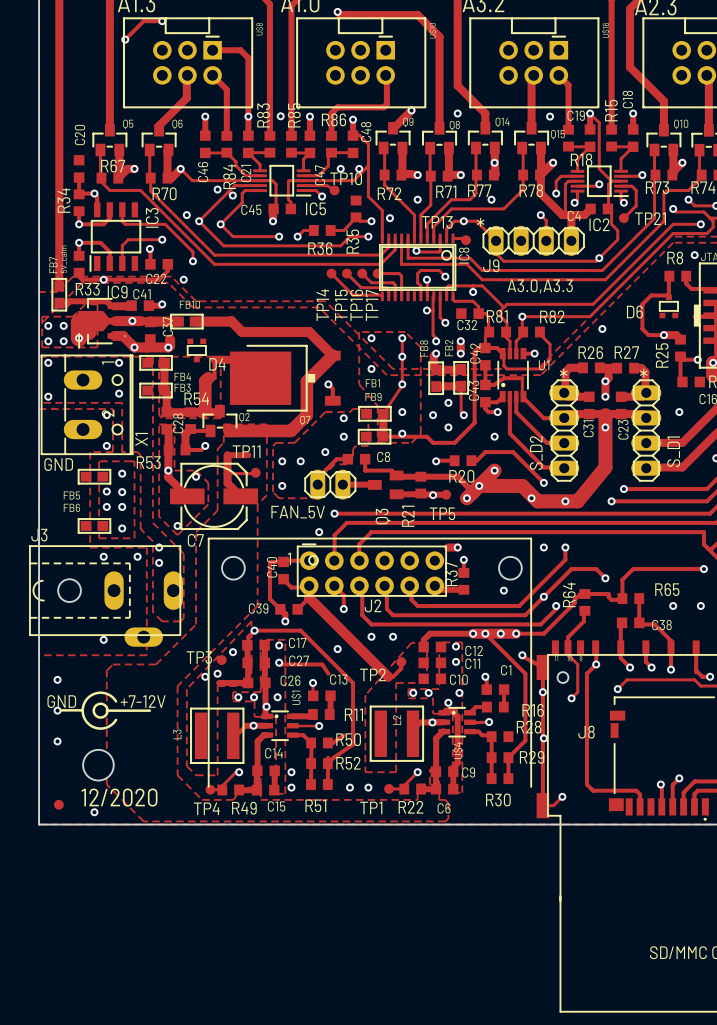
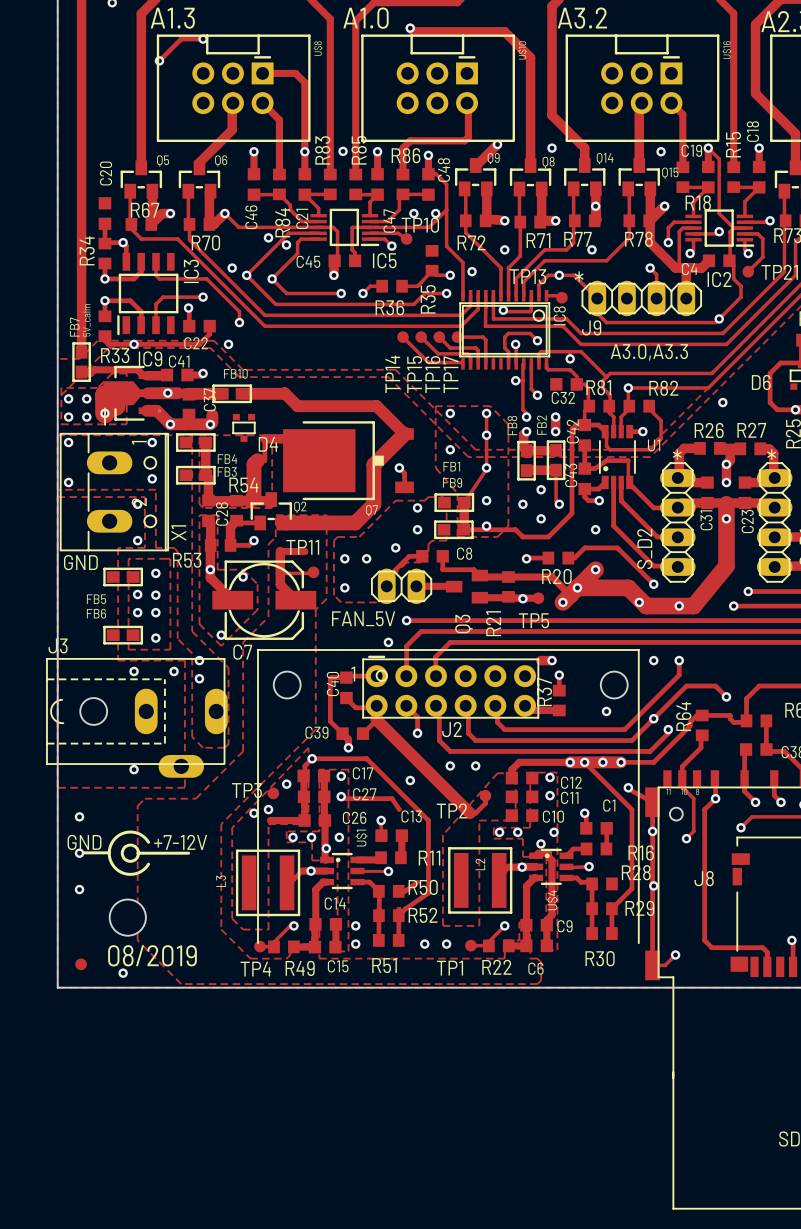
text: 12/2020 (119, 797) -> 08/2019 (152, 955)

